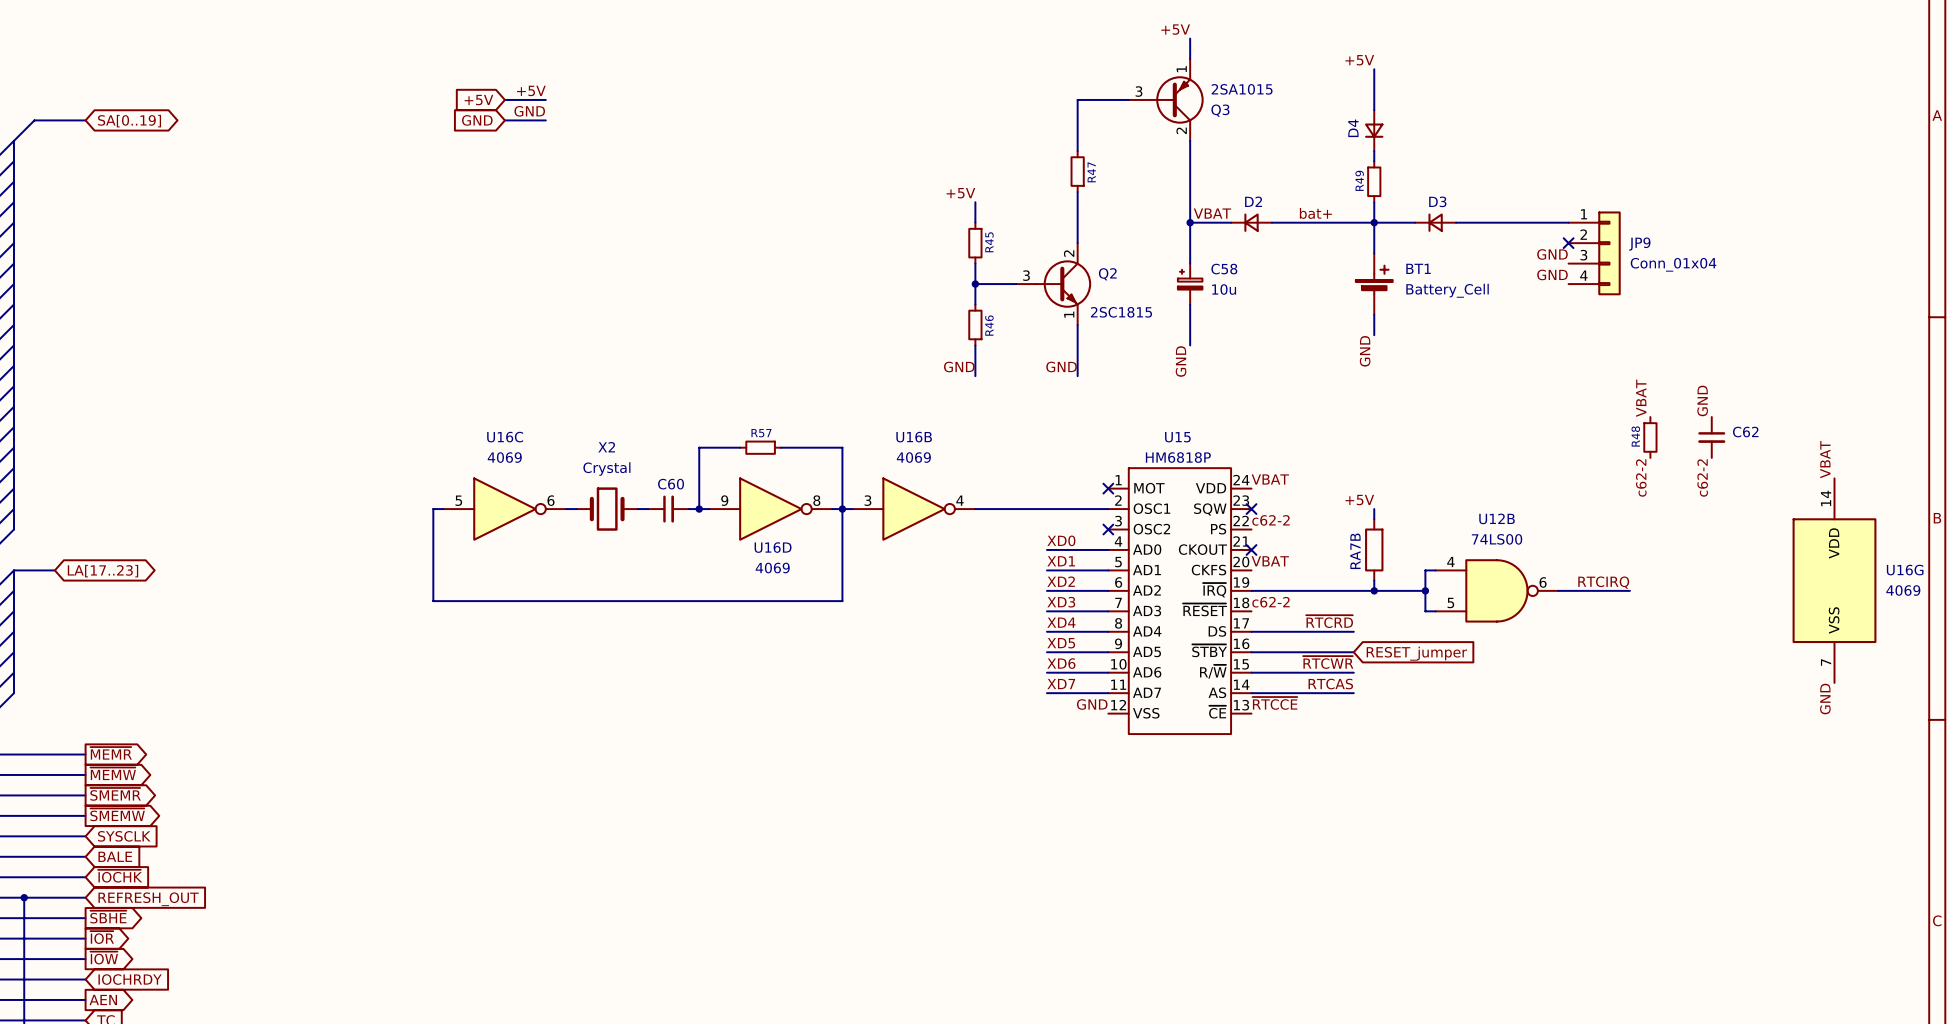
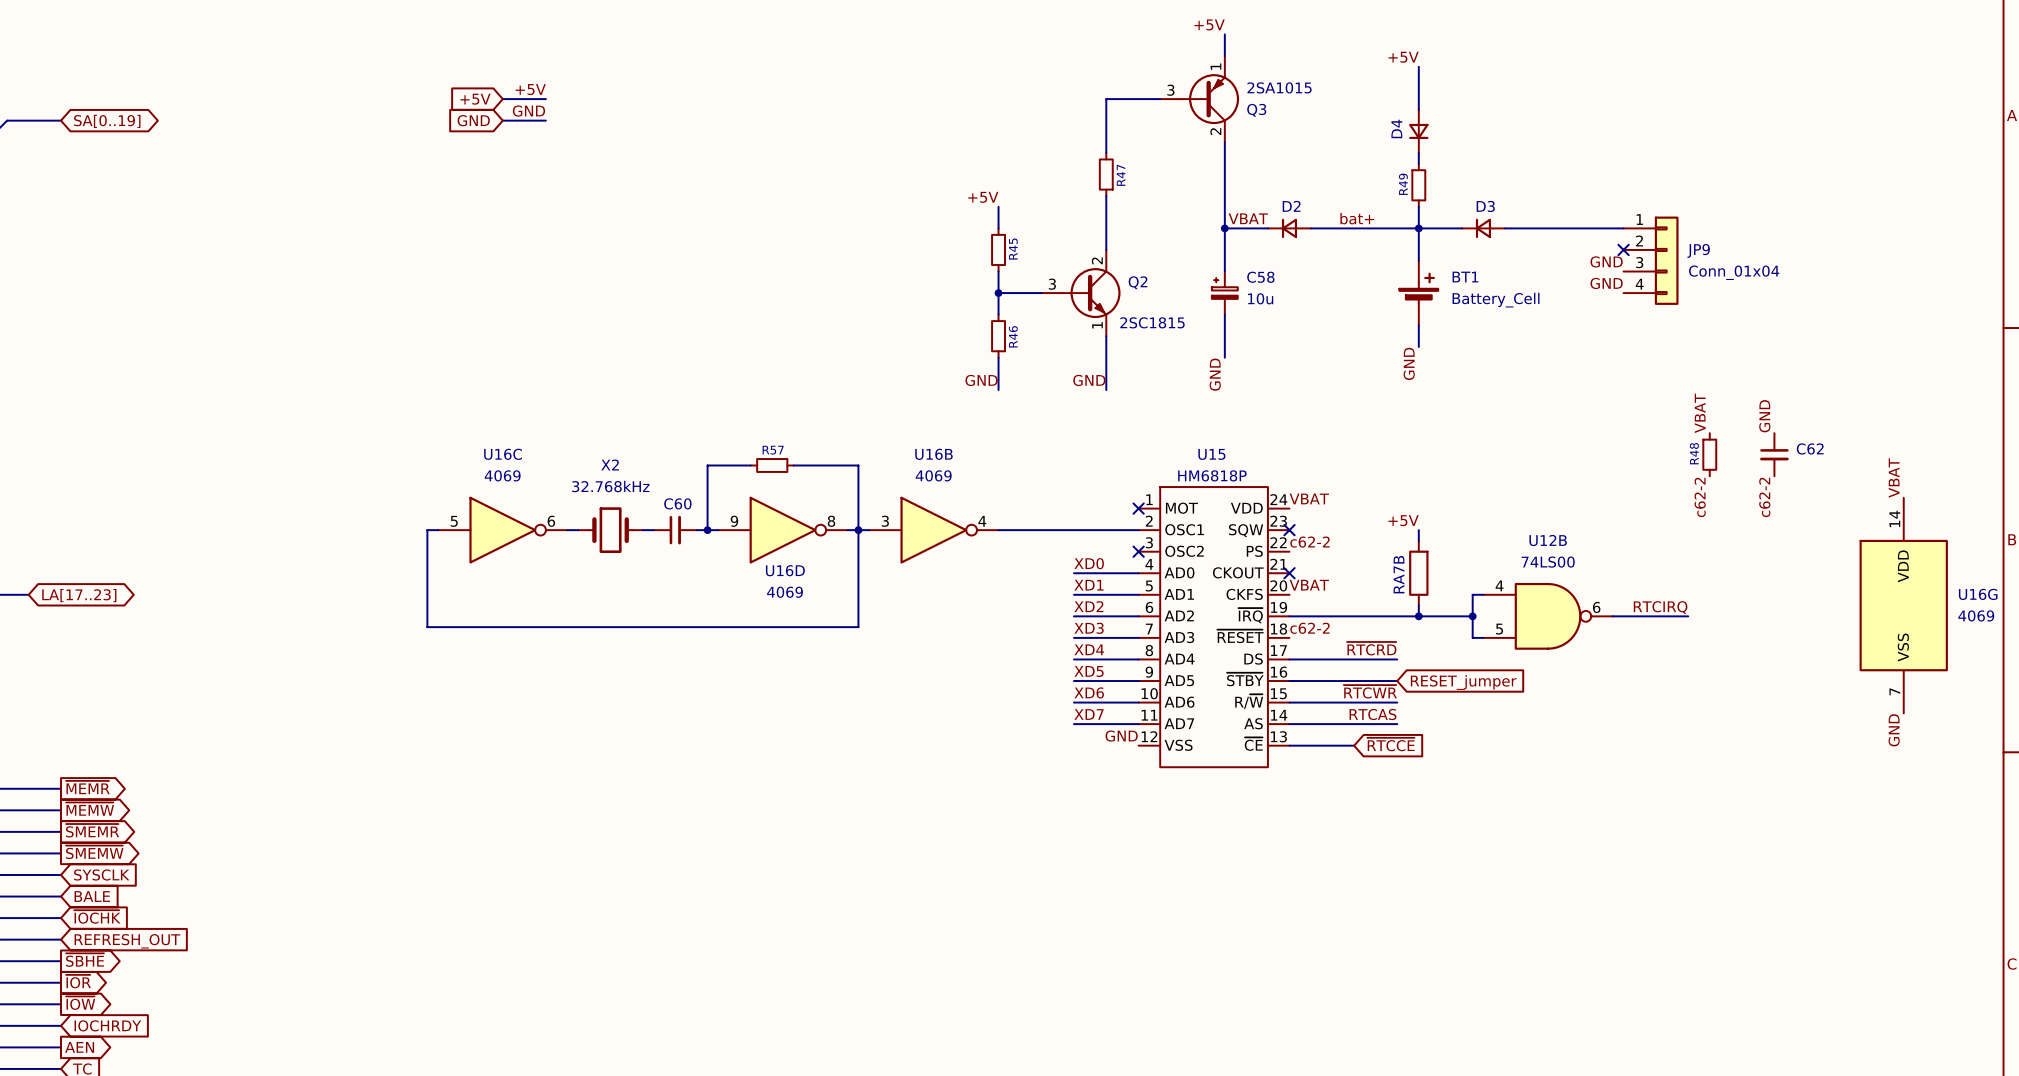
X2 value: Crystal (606, 469) -> 32.768kHz (610, 486)
label: ~{RTCCE} (1274, 703) -> none
global label: none -> ~{RTCCE} (1390, 744)
wire: none -> (1289, 745) (1354, 745)

